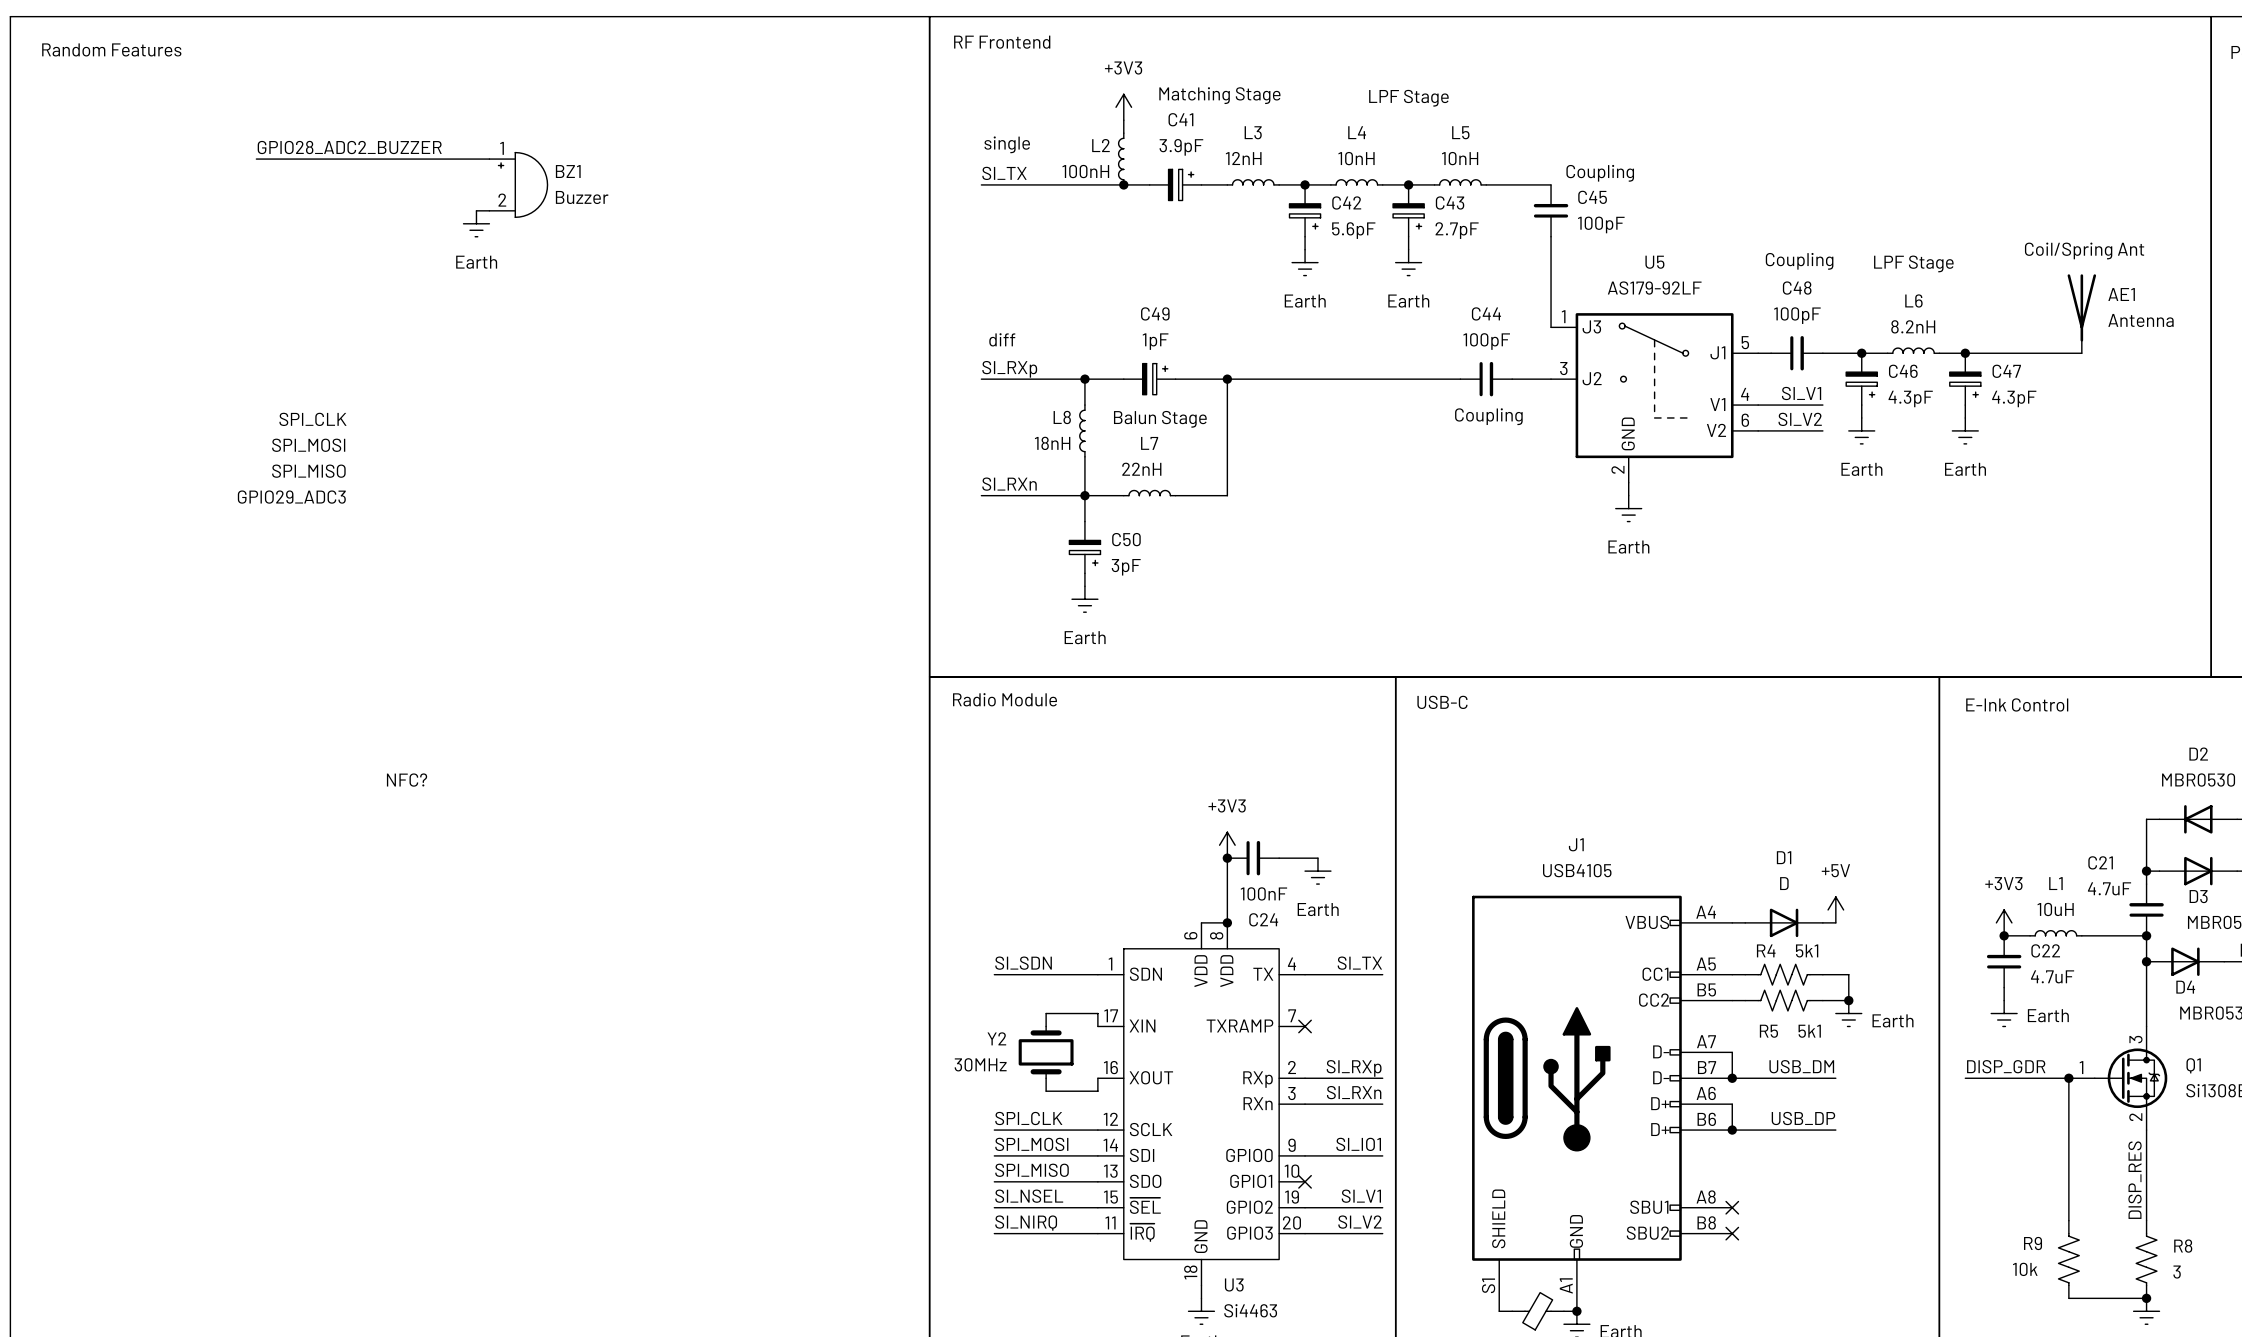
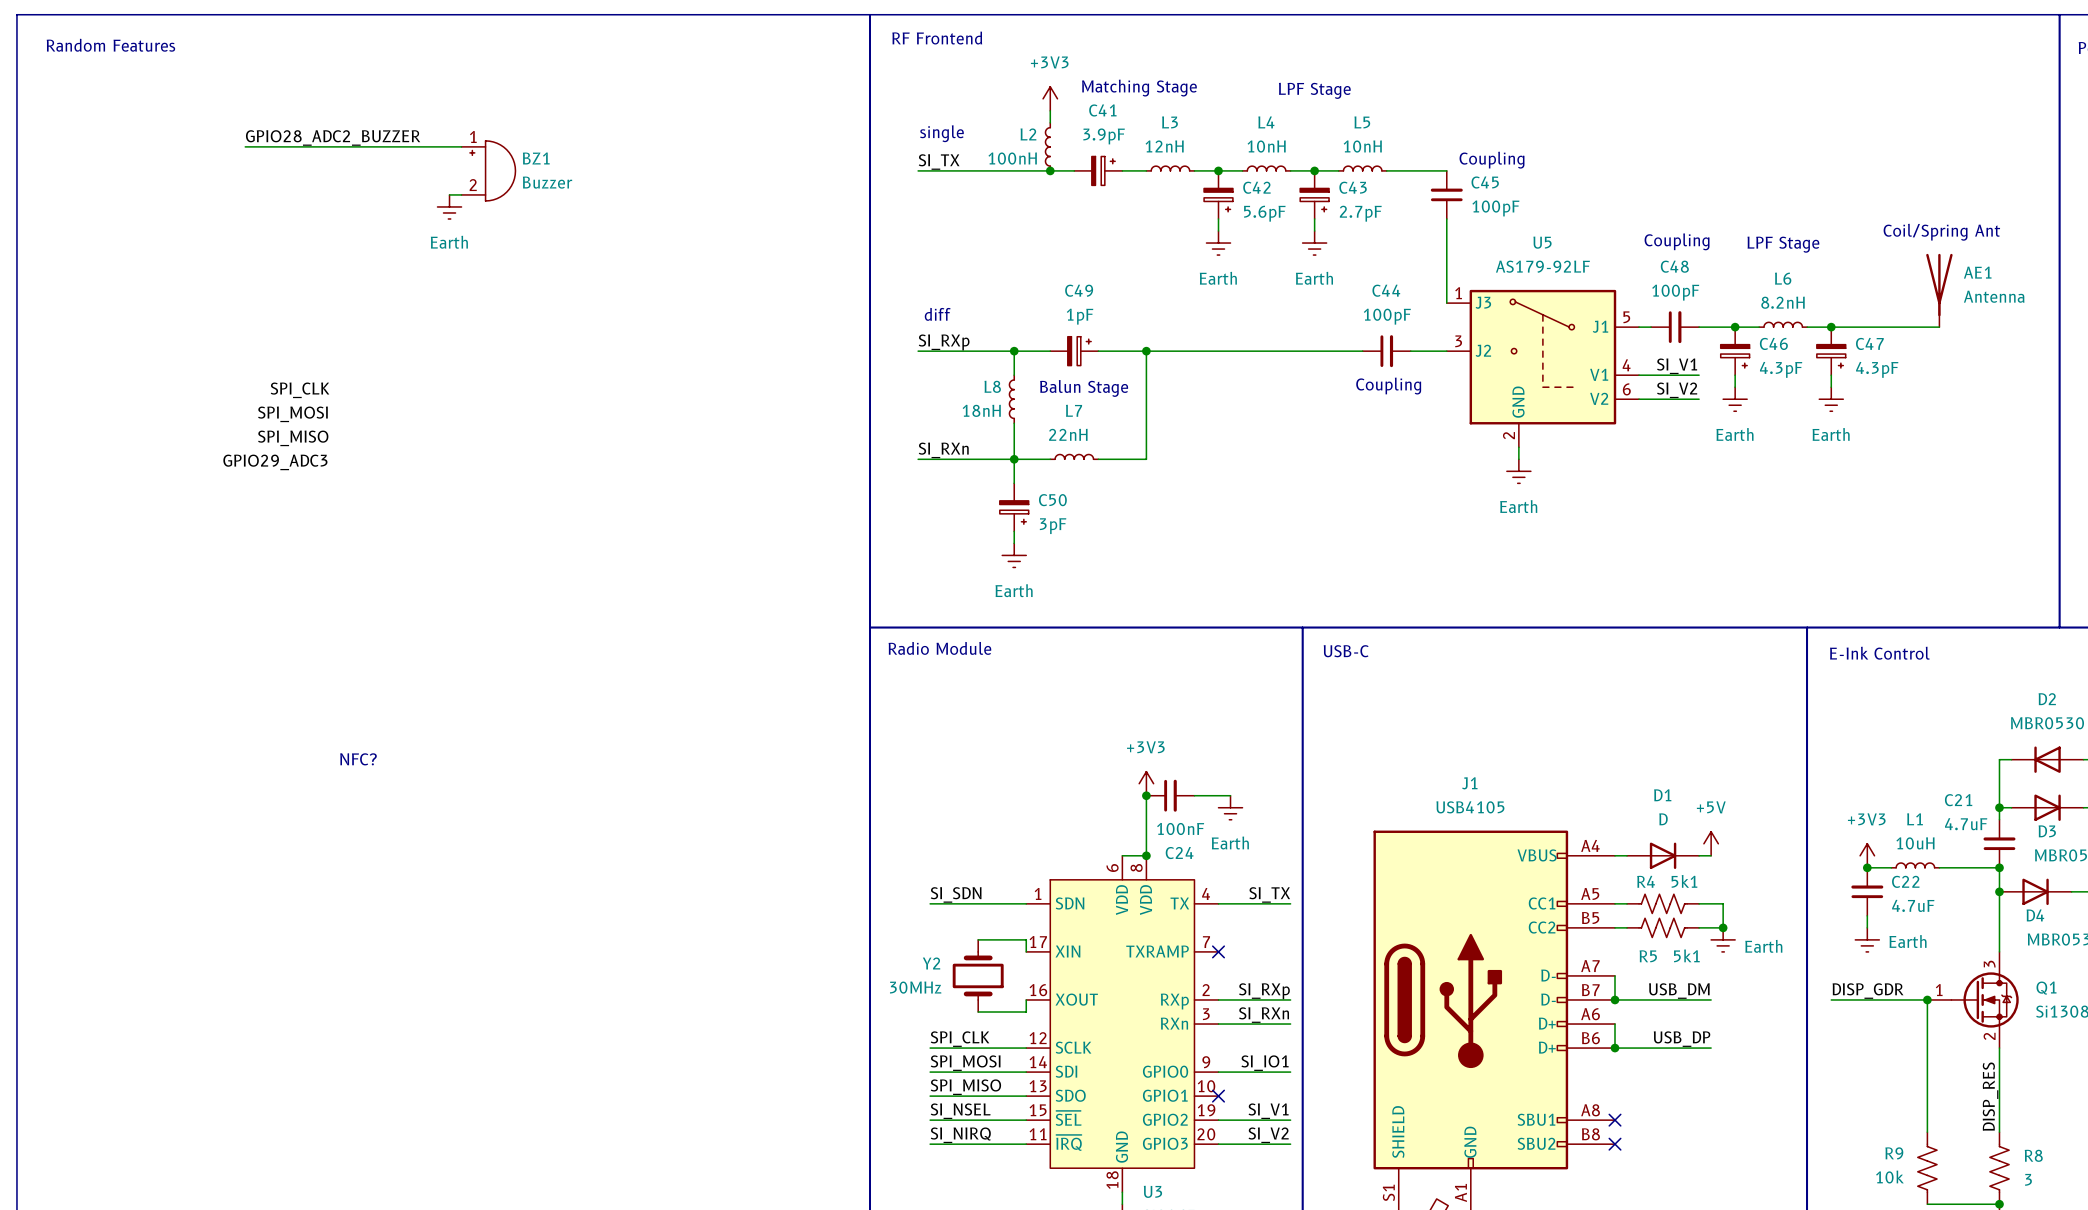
text position: NFC? (407, 780) -> NFC? (358, 759)

